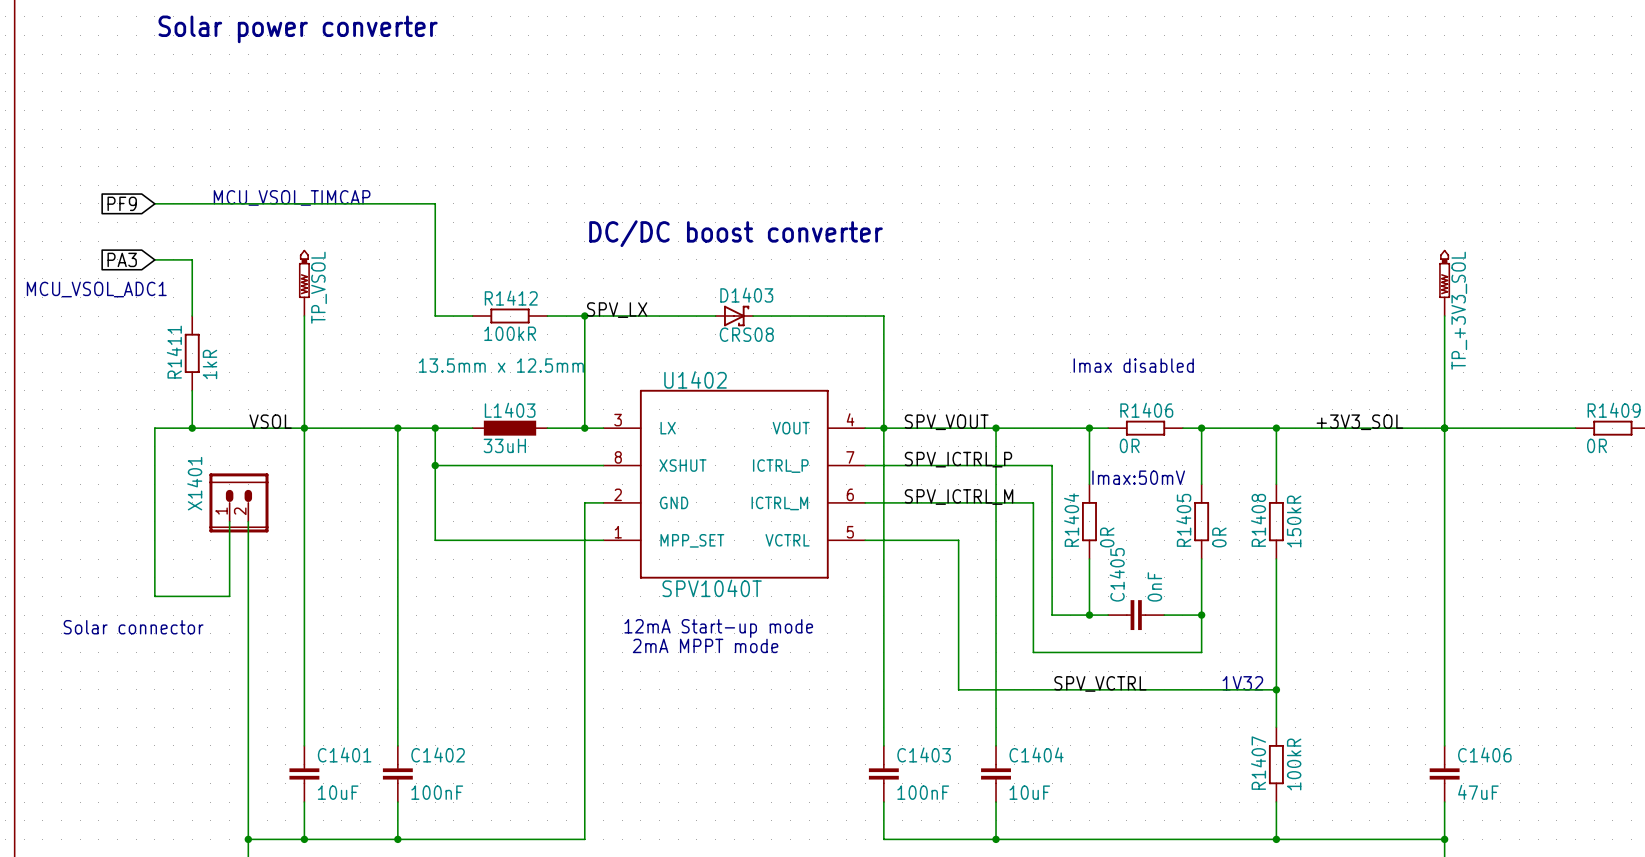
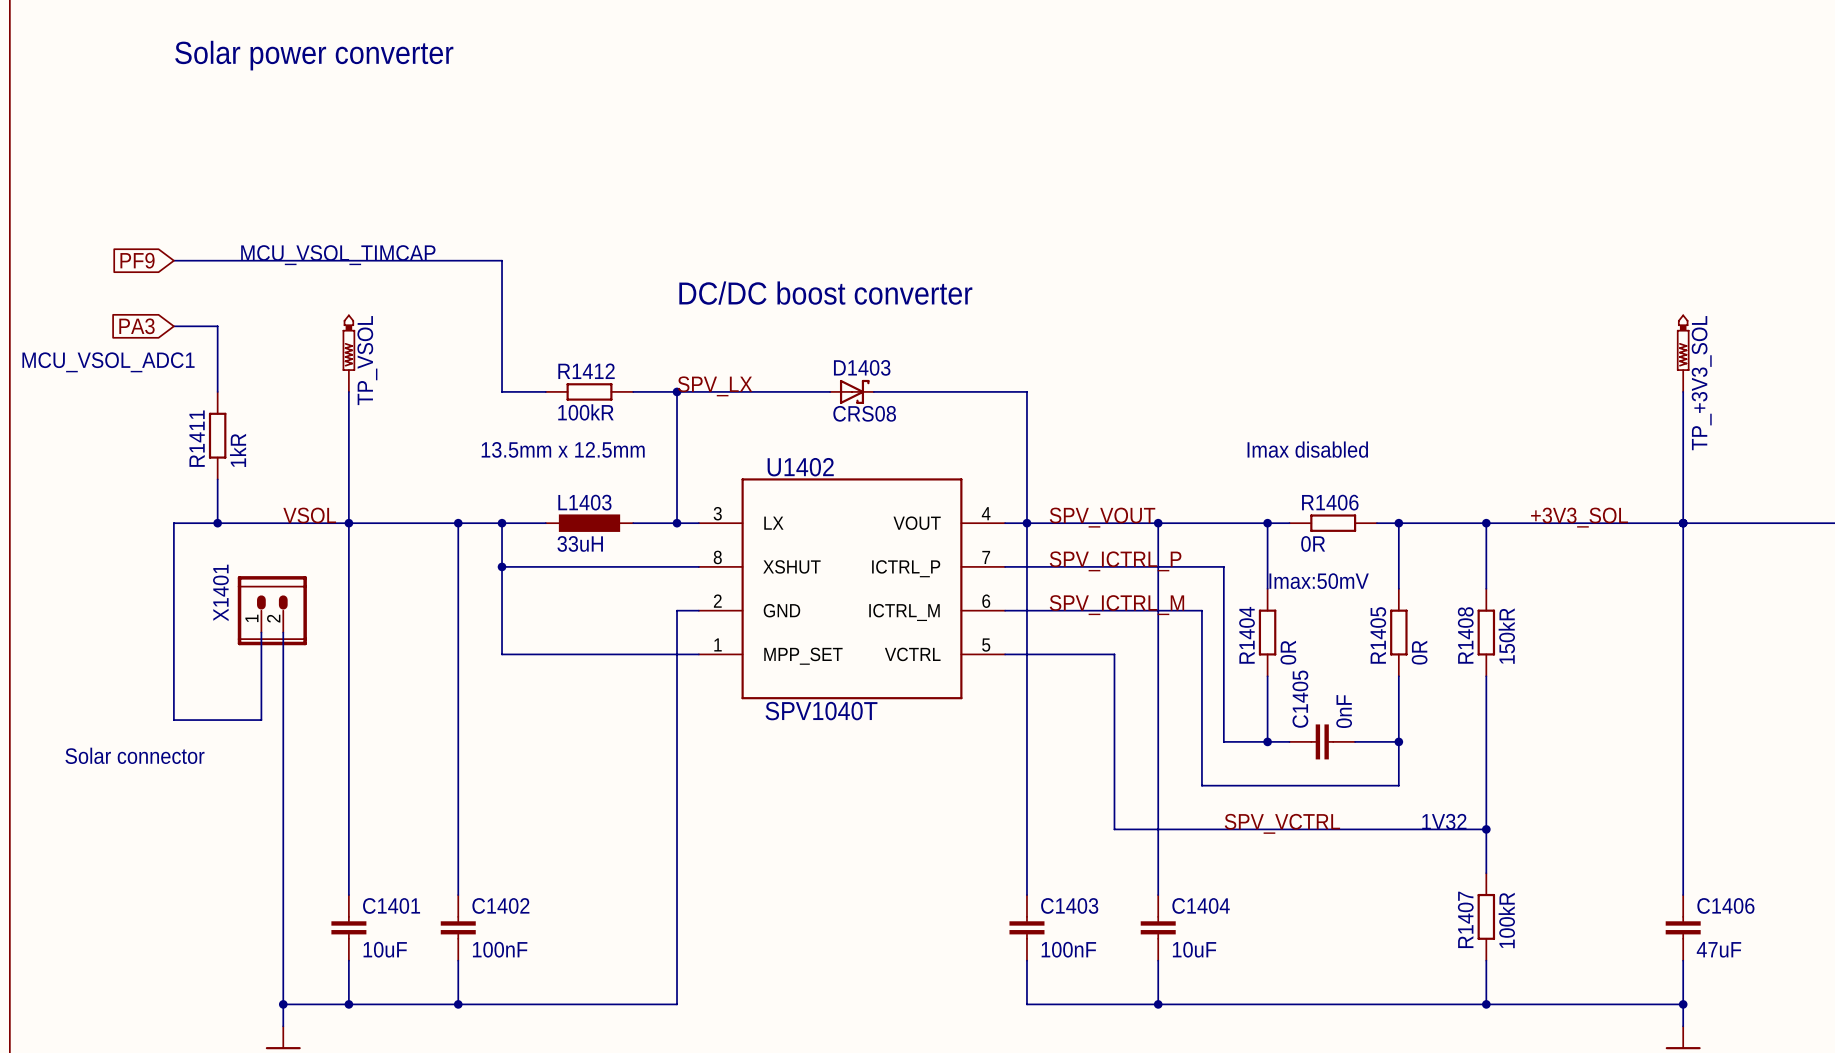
text: 12mA Start-up mode (718, 628) -> none
text: 2mA MPPT mode (705, 645) -> none

